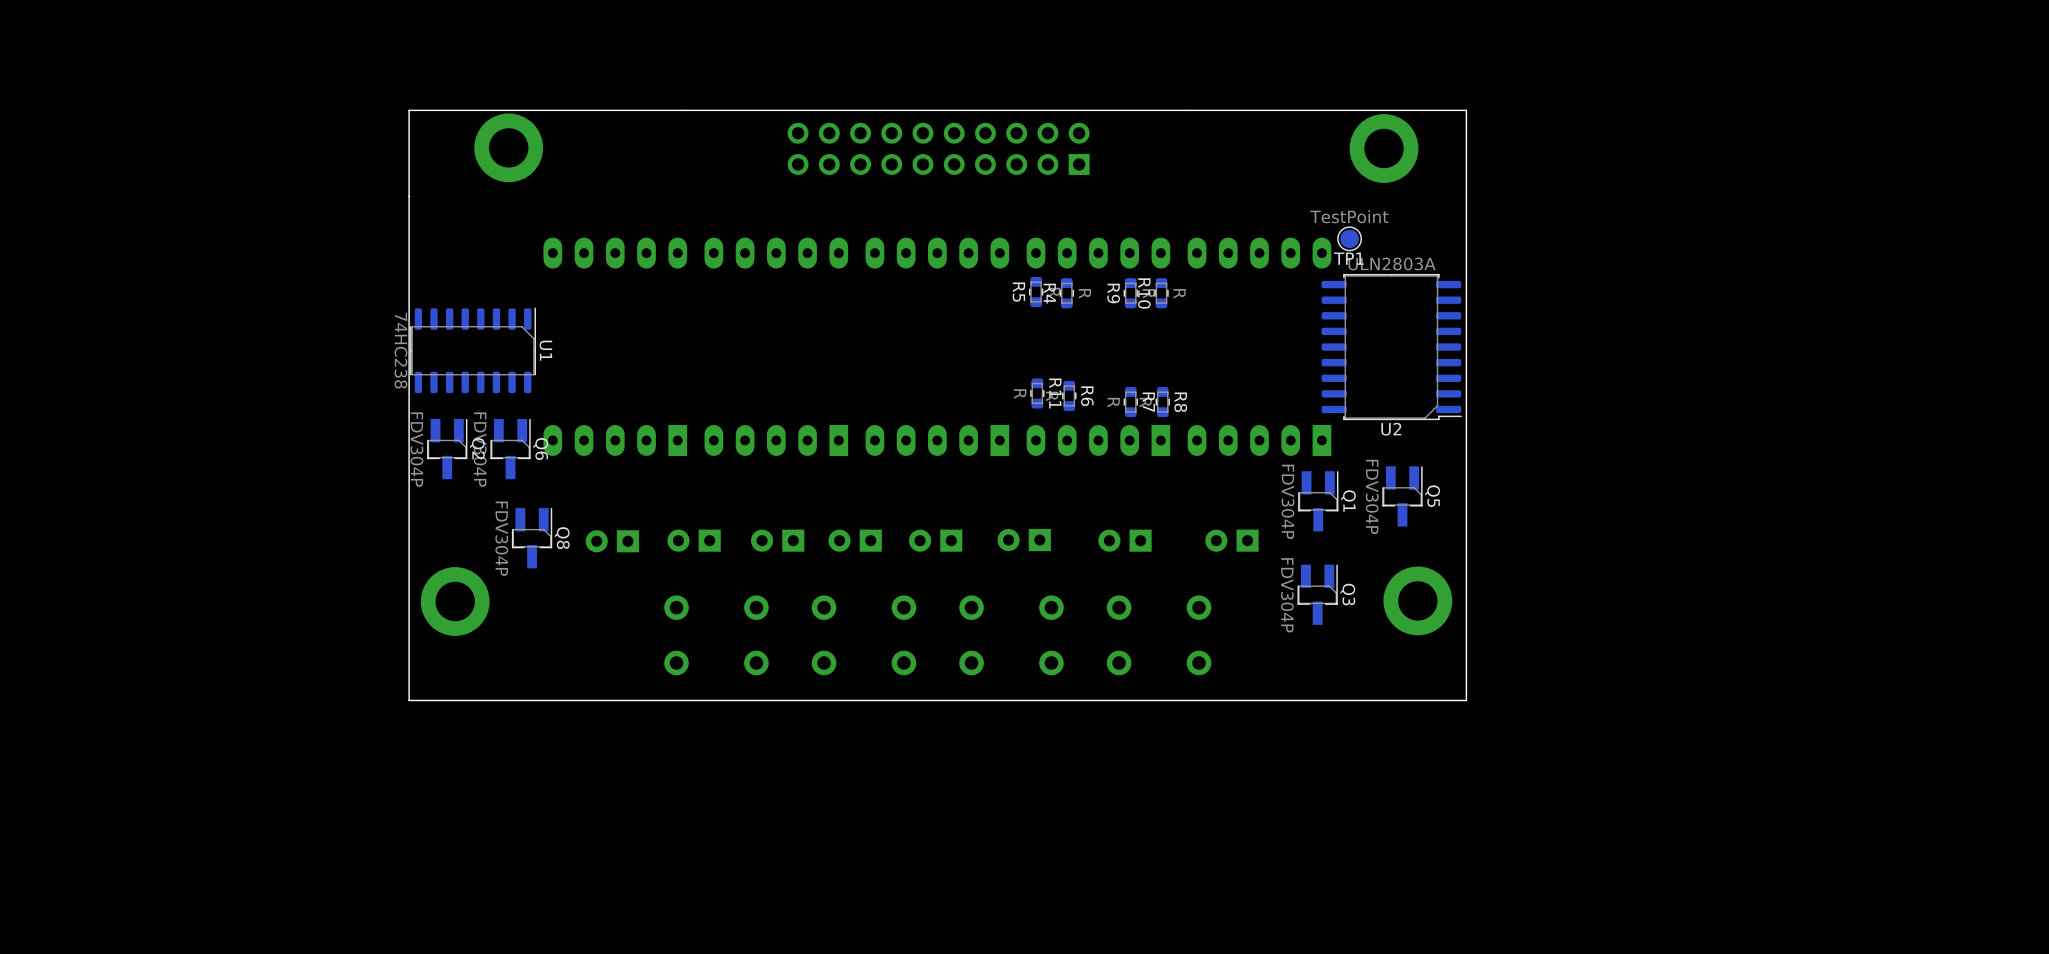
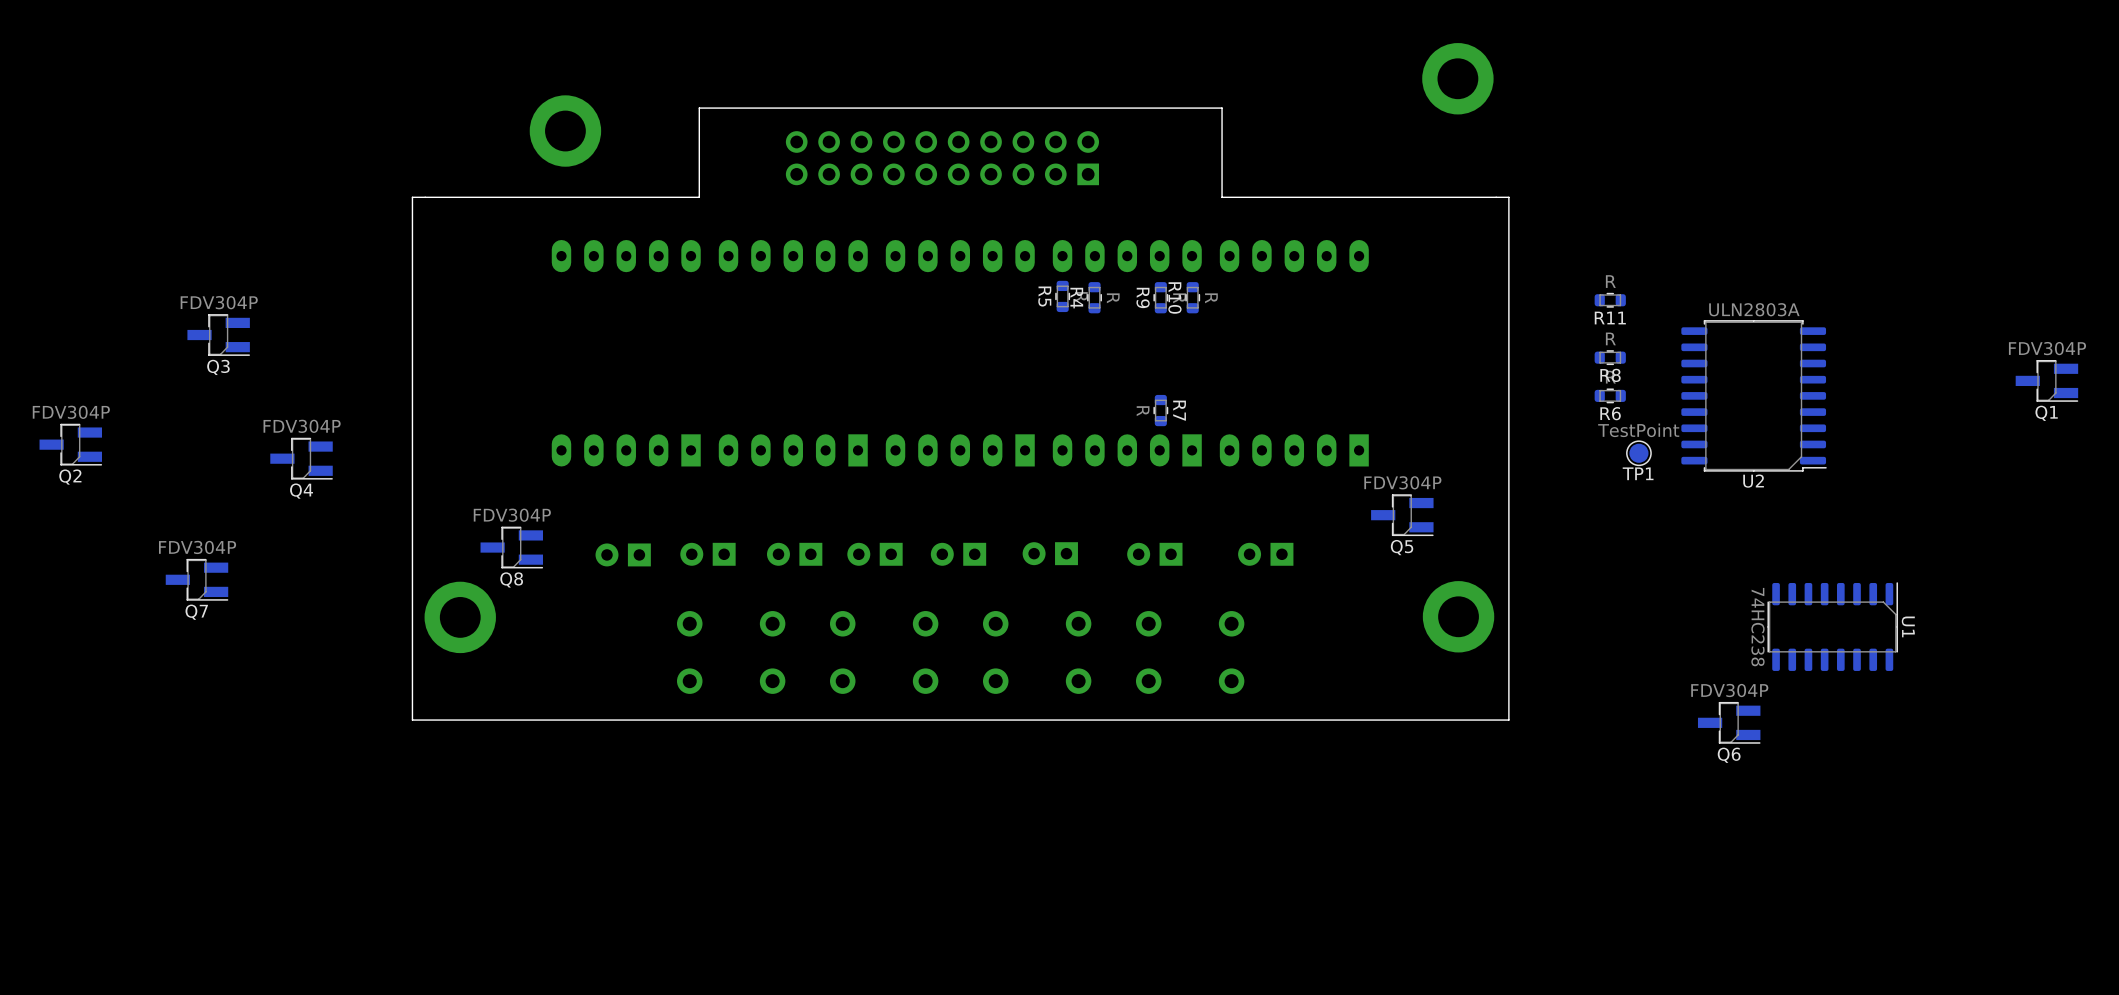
board edge: (685, 110) (409, 110) (409, 196) -> (699, 108) (699, 197) (412, 197)
board edge: (1189, 110) (1466, 110) (1466, 196) -> (1222, 108) (1222, 197) (1508, 197)
part position: (508, 147) -> (565, 131)
part position: (938, 148) -> (942, 158)
part position: (1384, 148) -> (1457, 78)
TP1 position: (1349, 238) -> (1638, 453)
U2 position: (1391, 347) -> (1754, 395)
U1 position: (473, 350) -> (1832, 626)
R11 rotation: 0° (1037, 393) -> 90° clockwise (1610, 300)
R11 position: (1037, 393) -> (1610, 300)
R6 rotation: 0° (1069, 395) -> 90° clockwise (1610, 395)
R6 position: (1069, 395) -> (1610, 395)
R8 rotation: 0° (1162, 402) -> 90° clockwise (1610, 357)
R8 position: (1162, 402) -> (1610, 357)
Q4: none -> FDV304P (301, 458)
Q2 rotation: 0° (447, 449) -> 90° clockwise (70, 444)
Q2 position: (447, 449) -> (70, 444)
Q6 rotation: 0° (510, 449) -> 90° clockwise (1729, 722)
Q6 position: (510, 449) -> (1729, 722)
Q5 rotation: 0° (1402, 496) -> 90° clockwise (1402, 515)
Q5 position: (1402, 496) -> (1402, 515)
Q1 rotation: 0° (1318, 501) -> 90° clockwise (2046, 380)
Q1 position: (1318, 501) -> (2046, 380)
Q8 rotation: 0° (532, 538) -> 90° clockwise (511, 547)
Q7: none -> FDV304P (197, 579)
Q3 rotation: 0° (1317, 594) -> 90° clockwise (218, 335)
Q3 position: (1317, 594) -> (218, 335)

